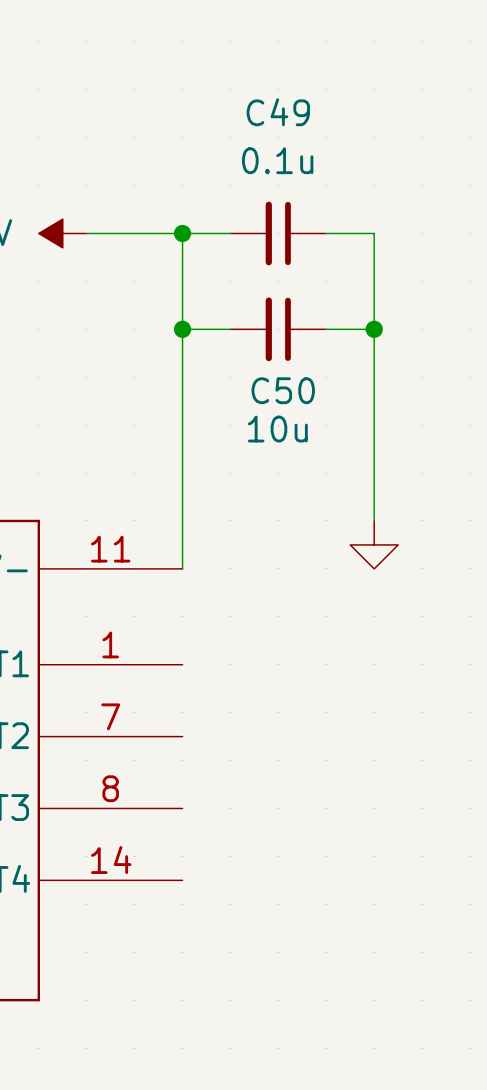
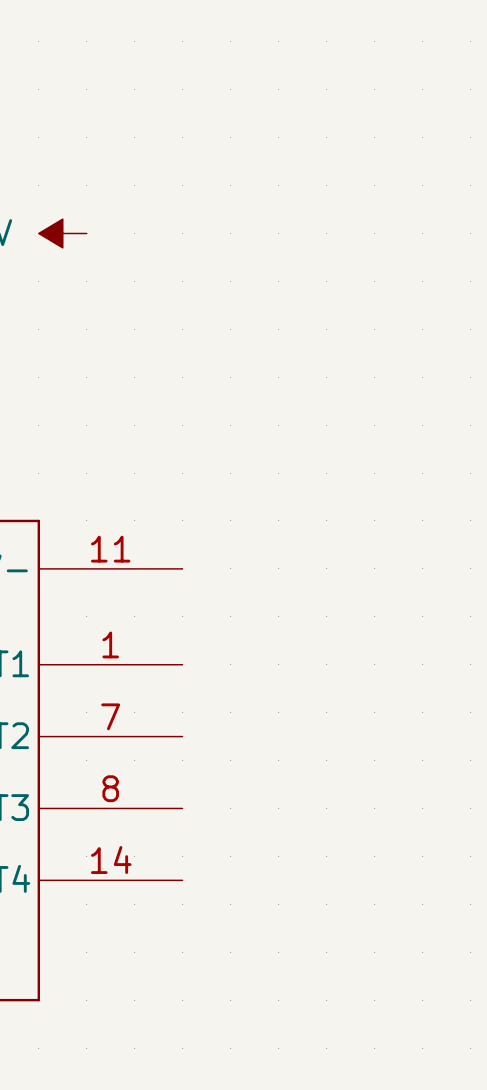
wire: (86, 233) (230, 233) -> none
wire: (182, 233) (182, 568) -> none
junction: (182, 233) -> none
C49: 0.1u (278, 233) -> none
wire: (326, 233) (374, 233) (374, 520) -> none
wire: (182, 329) (230, 329) -> none
junction: (182, 329) -> none
C50: 10u (278, 329) -> none
wire: (326, 329) (374, 329) -> none
junction: (374, 329) -> none
power symbol: (374, 544) -> none

